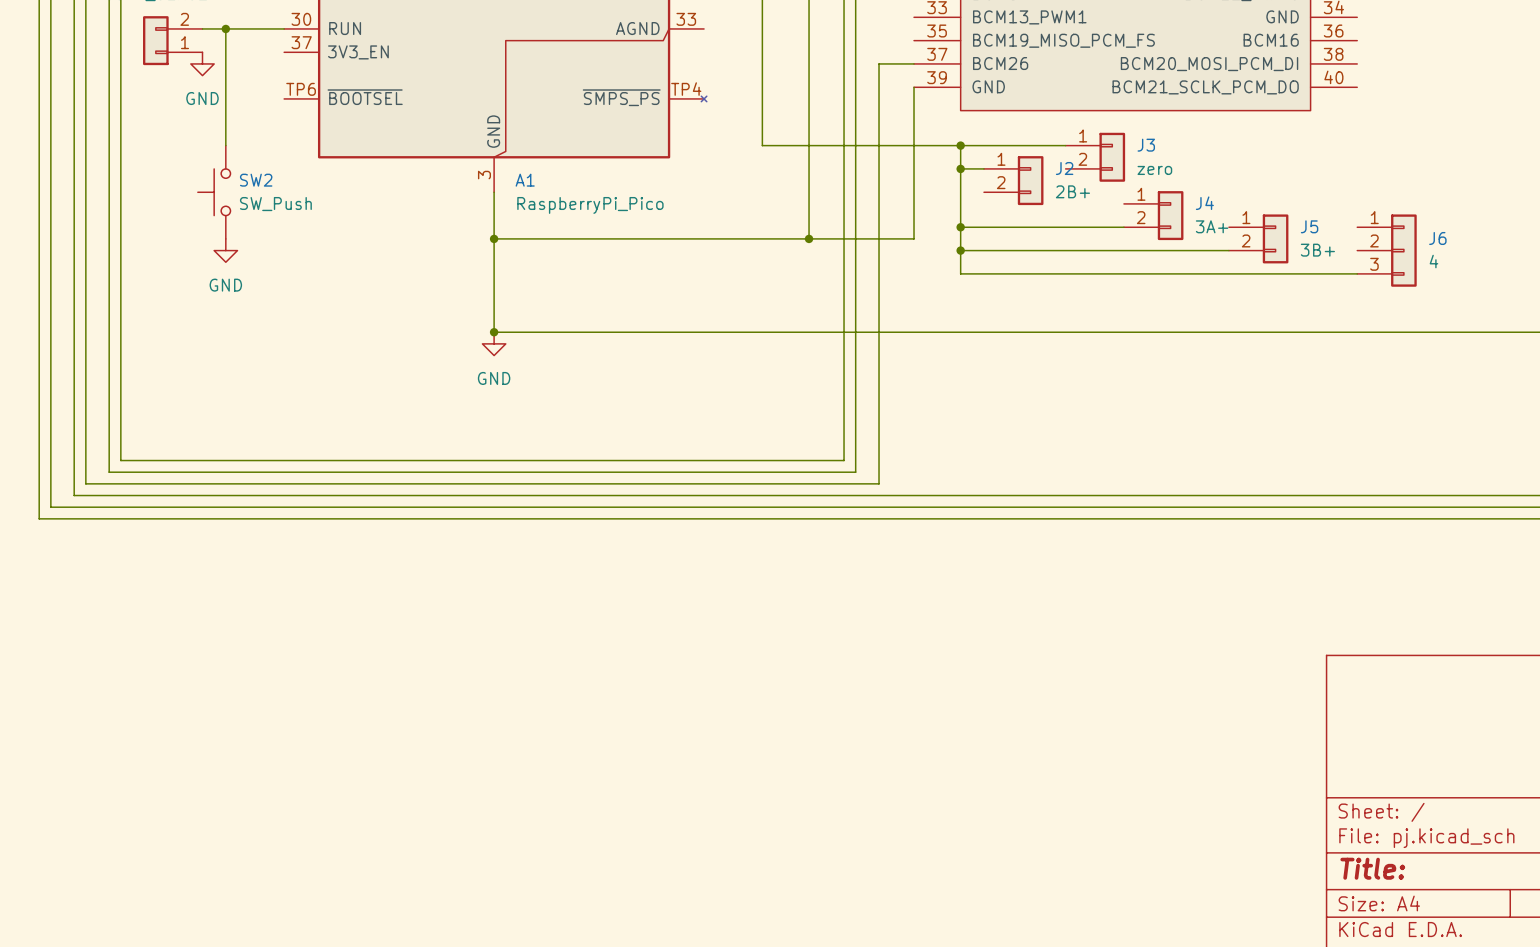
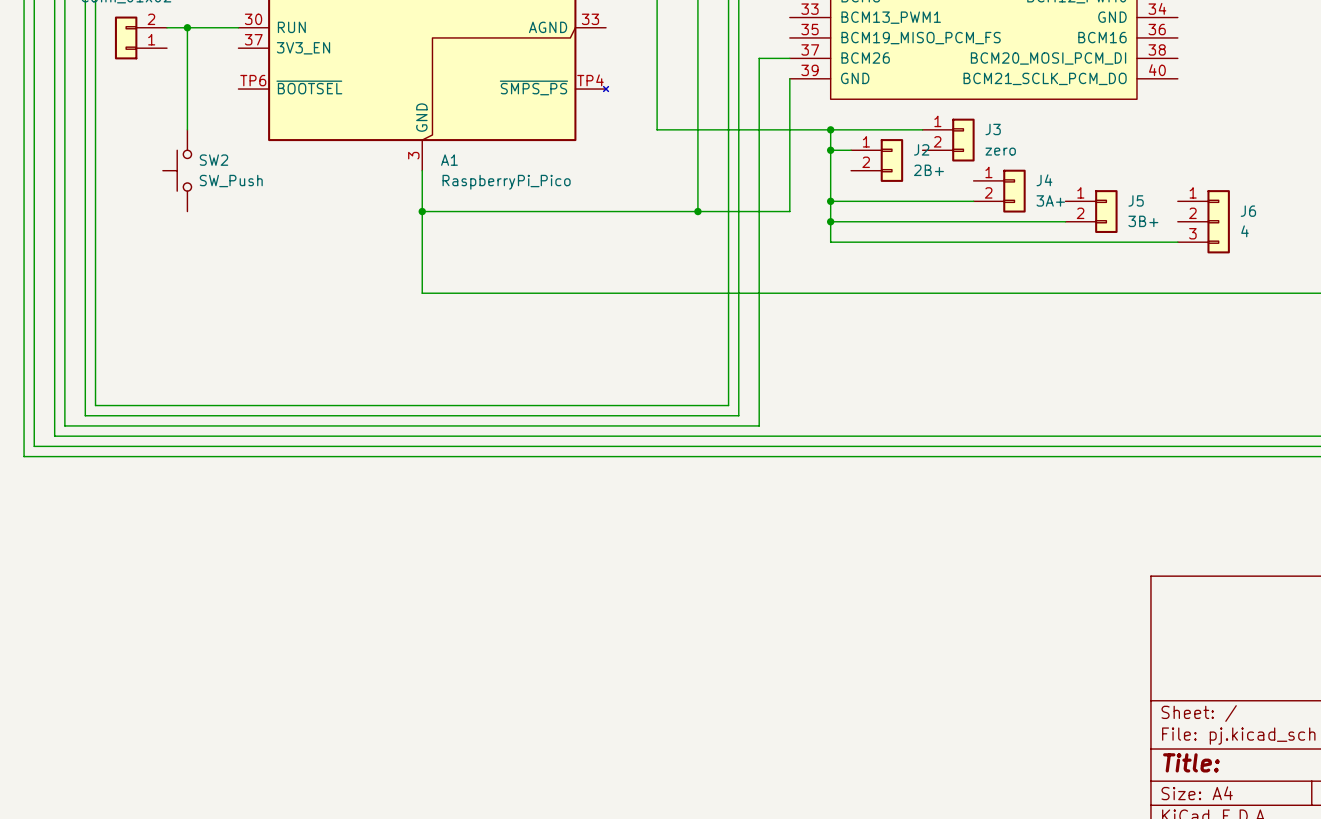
power symbol: GND (202, 63) -> none
power symbol: GND (225, 250) -> none
junction: (494, 332) -> none
power symbol: GND (494, 343) -> none

